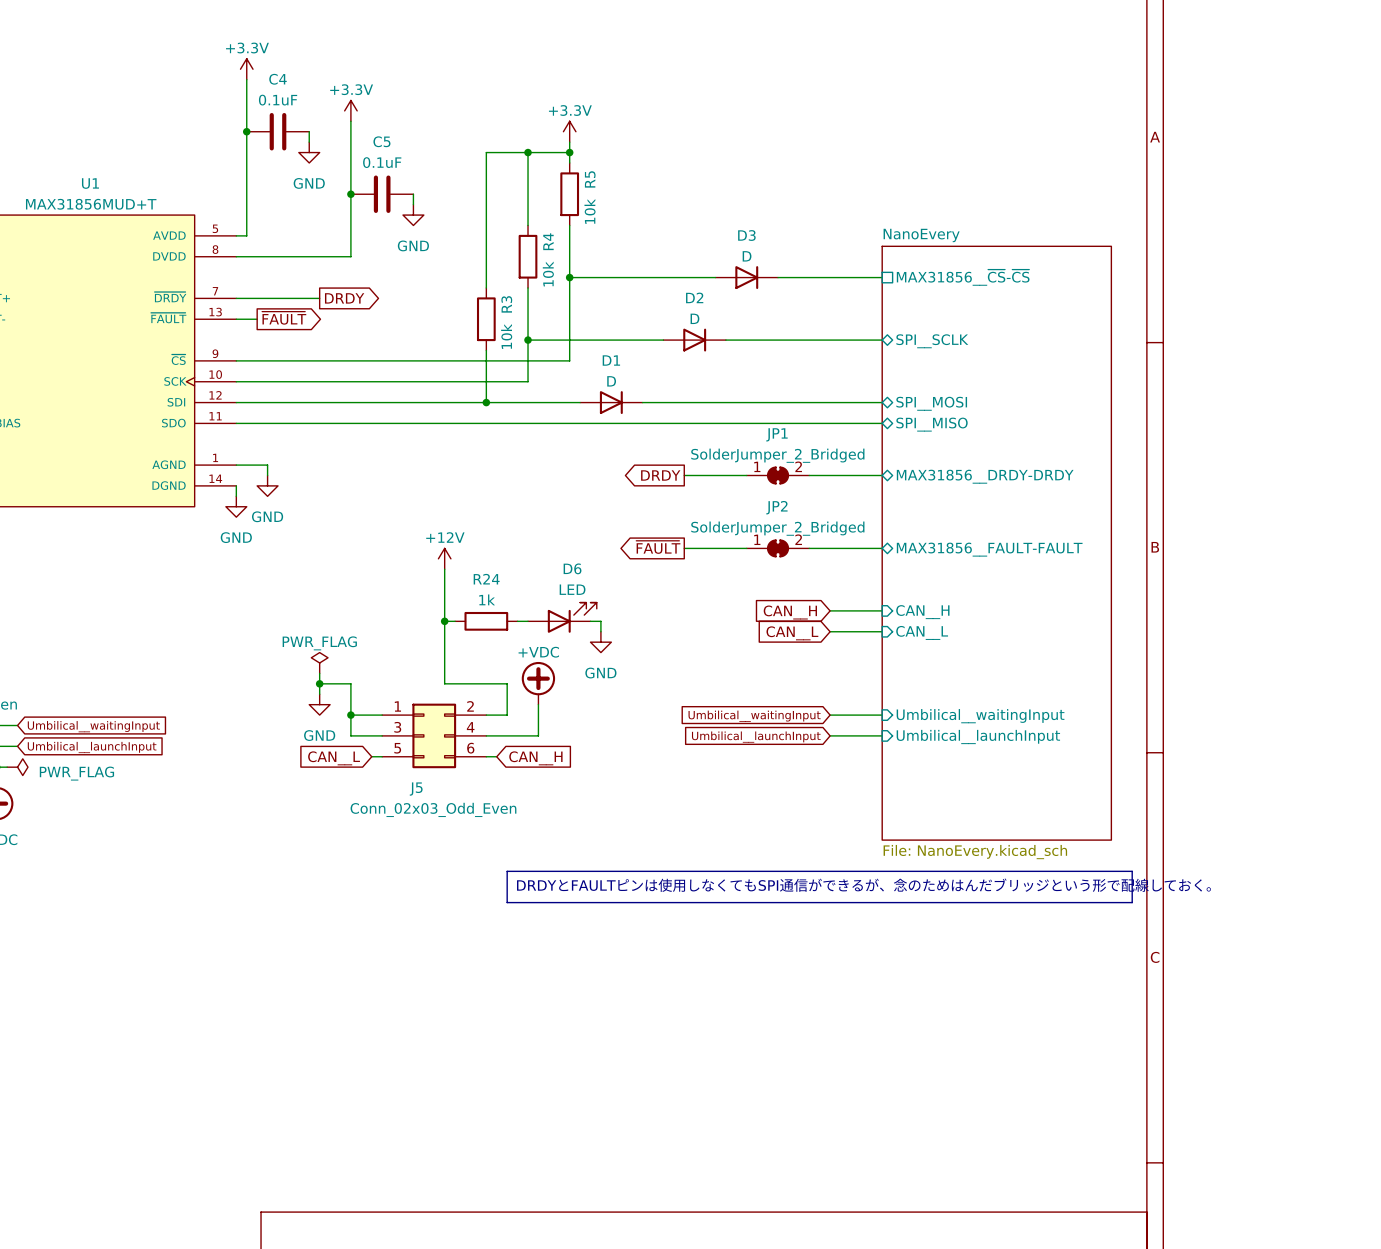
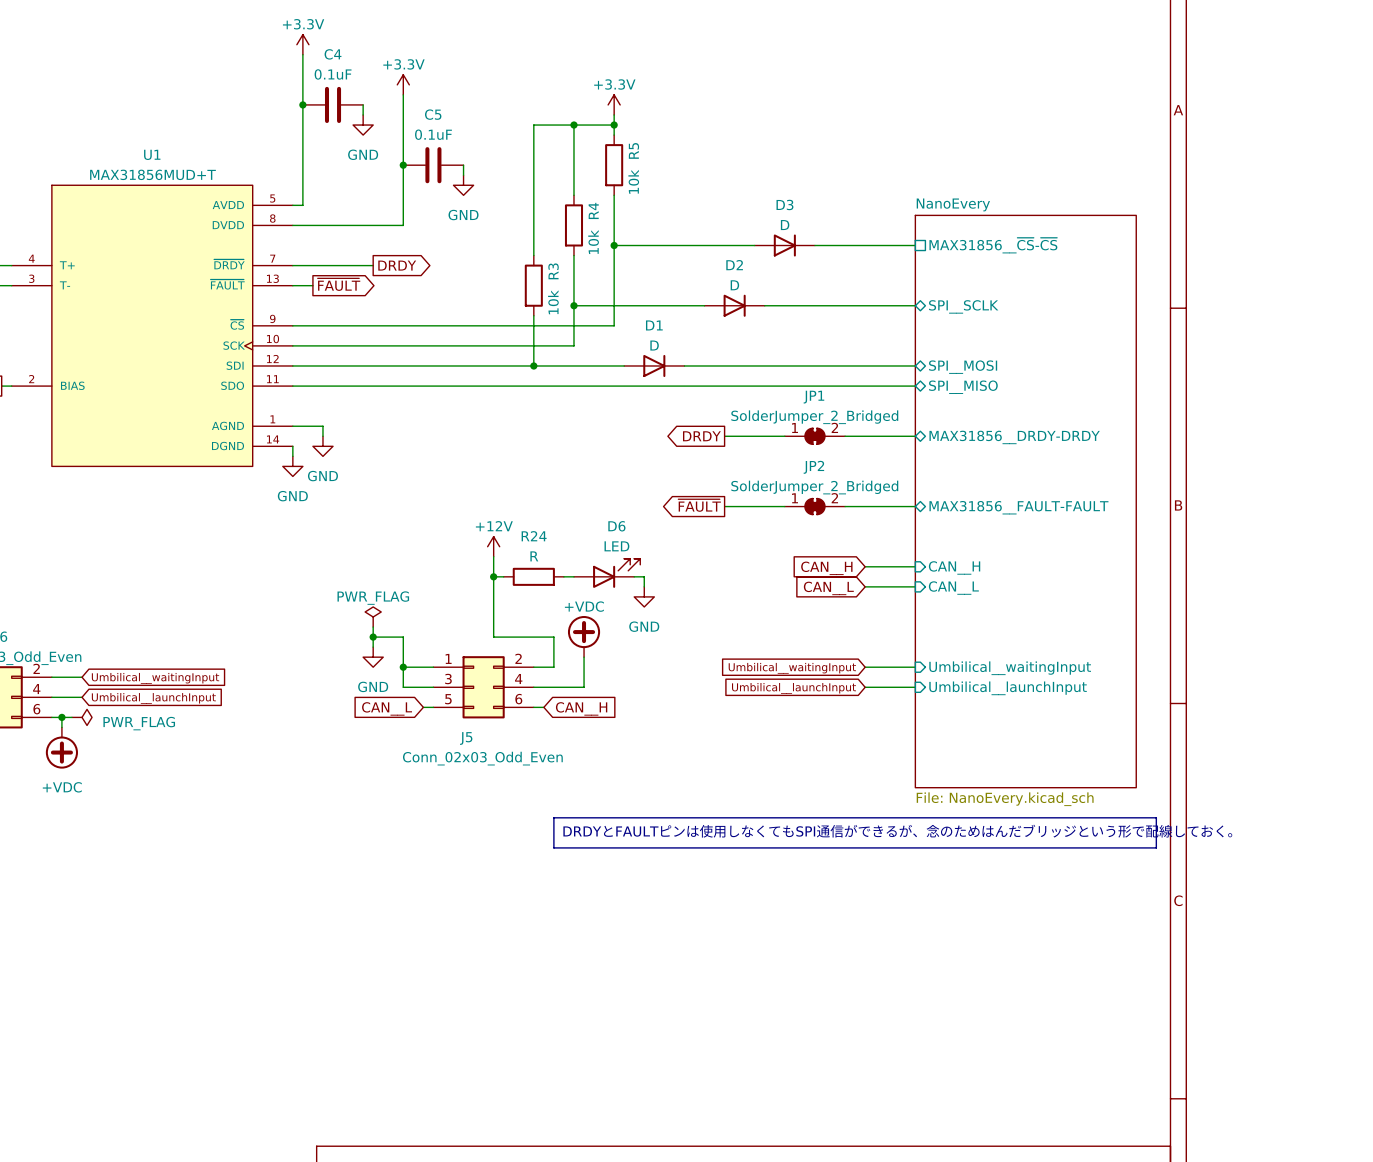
power symbol position: +12V (444, 558) -> +12V (493, 546)
R24 value: 1k (487, 599) -> R (534, 556)

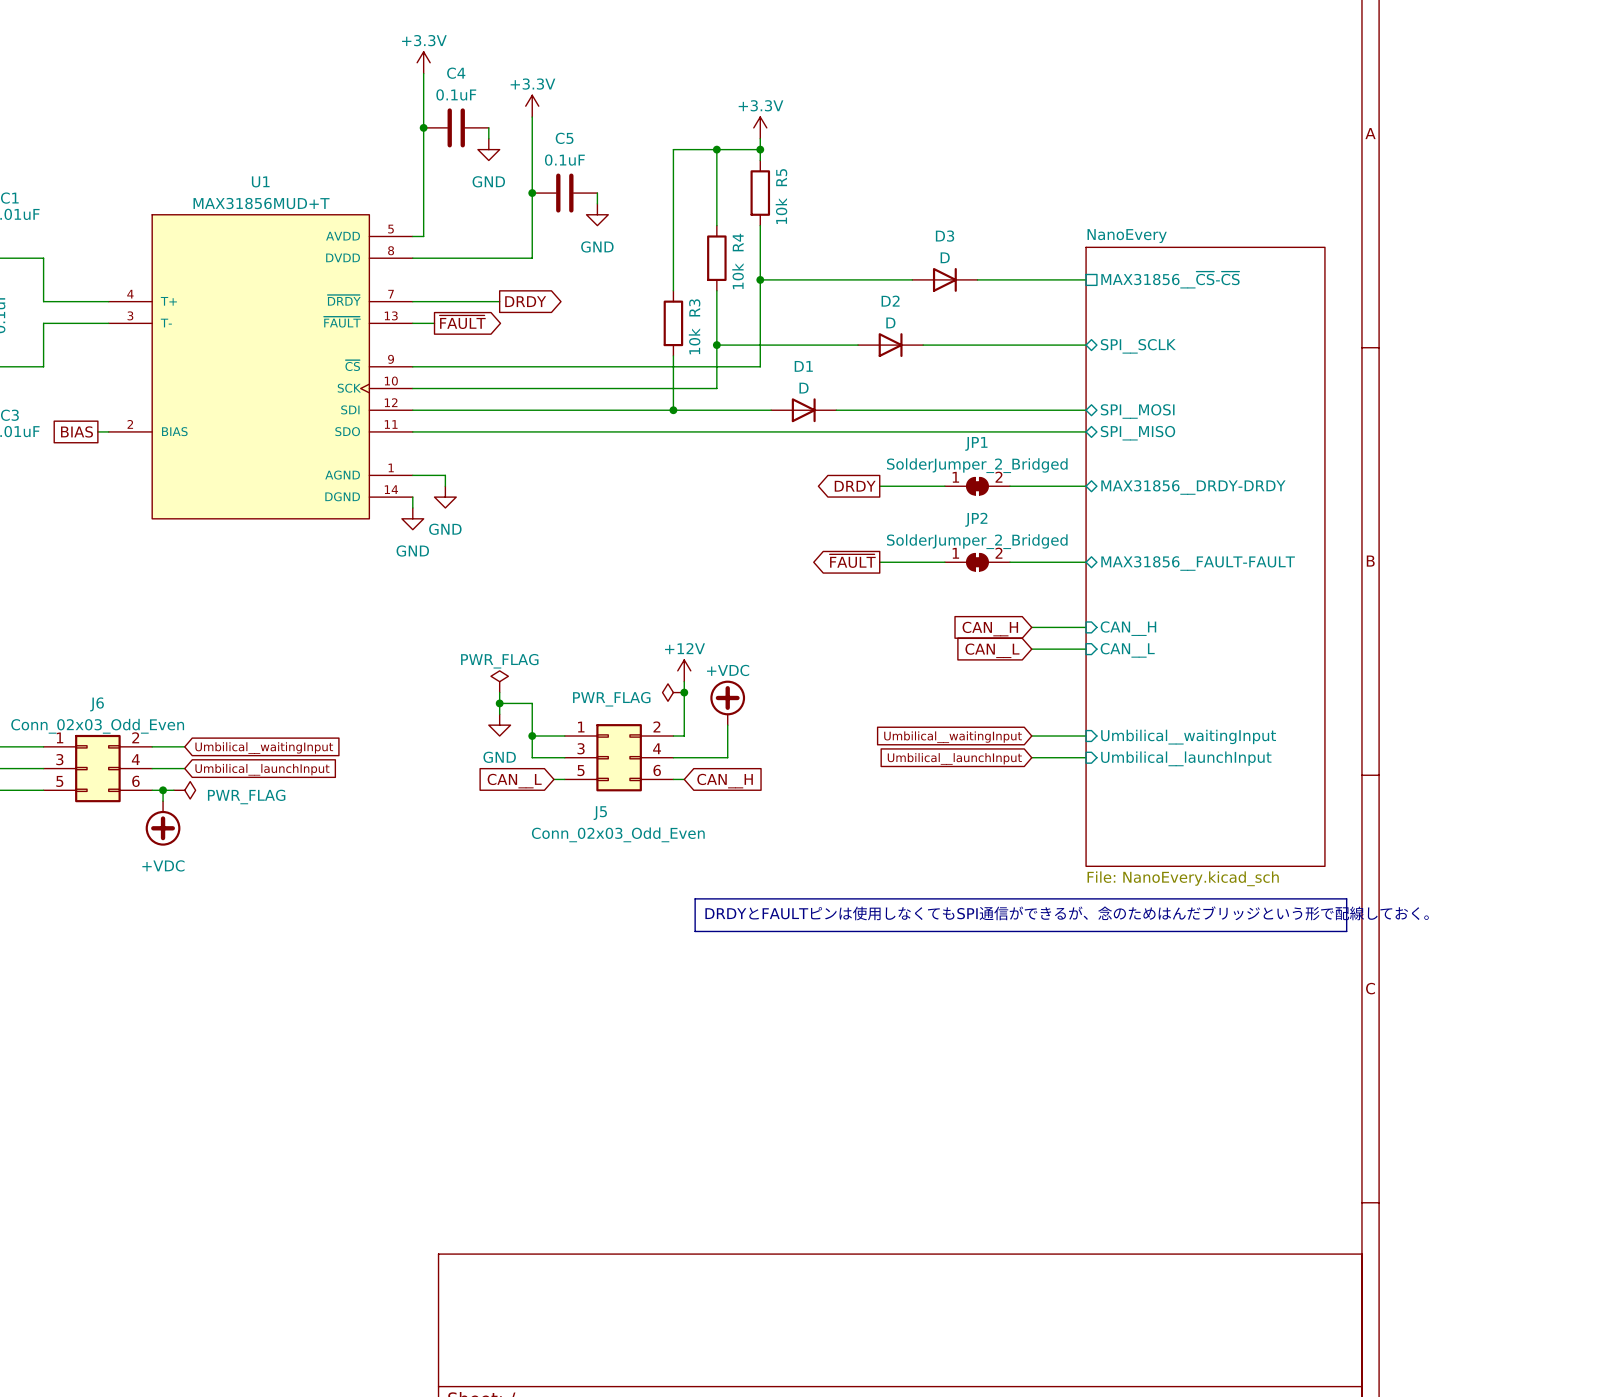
power symbol position: +12V (493, 546) -> +12V (684, 670)
wire: (493, 556) (493, 637) (553, 637) (553, 667) (543, 667) -> (684, 681) (684, 736)
D6: LED (607, 573) -> none
wire: (493, 576) (503, 576) -> none
junction: (493, 576) -> none
R24: R (533, 576) -> none
wire: (563, 576) (573, 576) -> none
wire: (634, 576) (644, 576) (644, 586) -> none
power symbol: GND (644, 596) -> none
power symbol: none -> PWR_FLAG (673, 692)
junction: none -> (684, 692)

